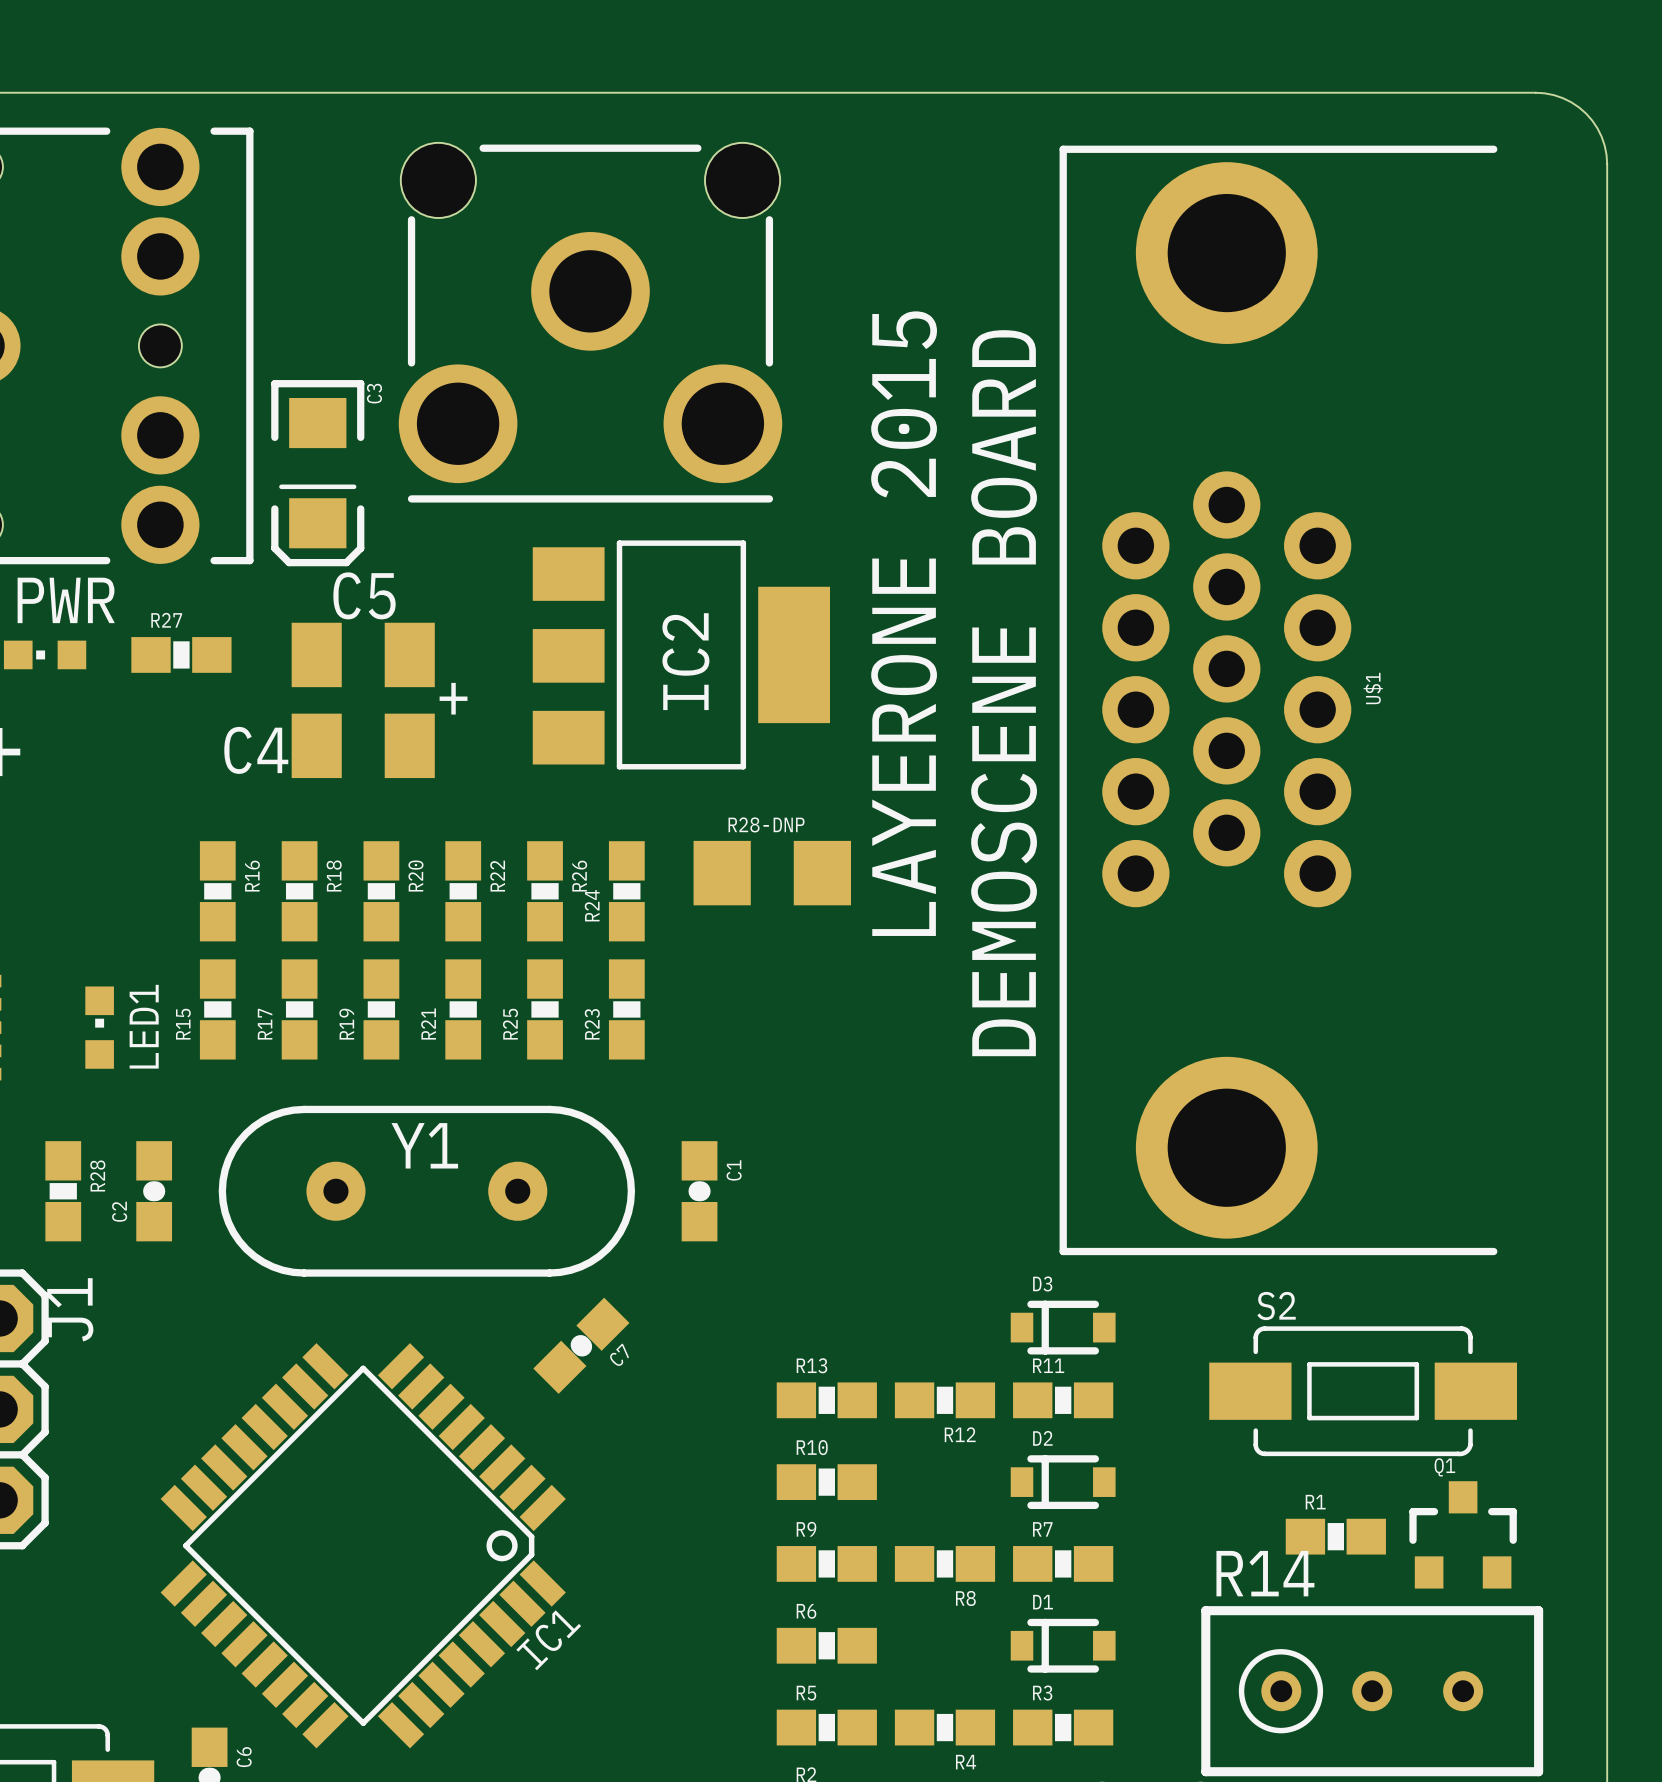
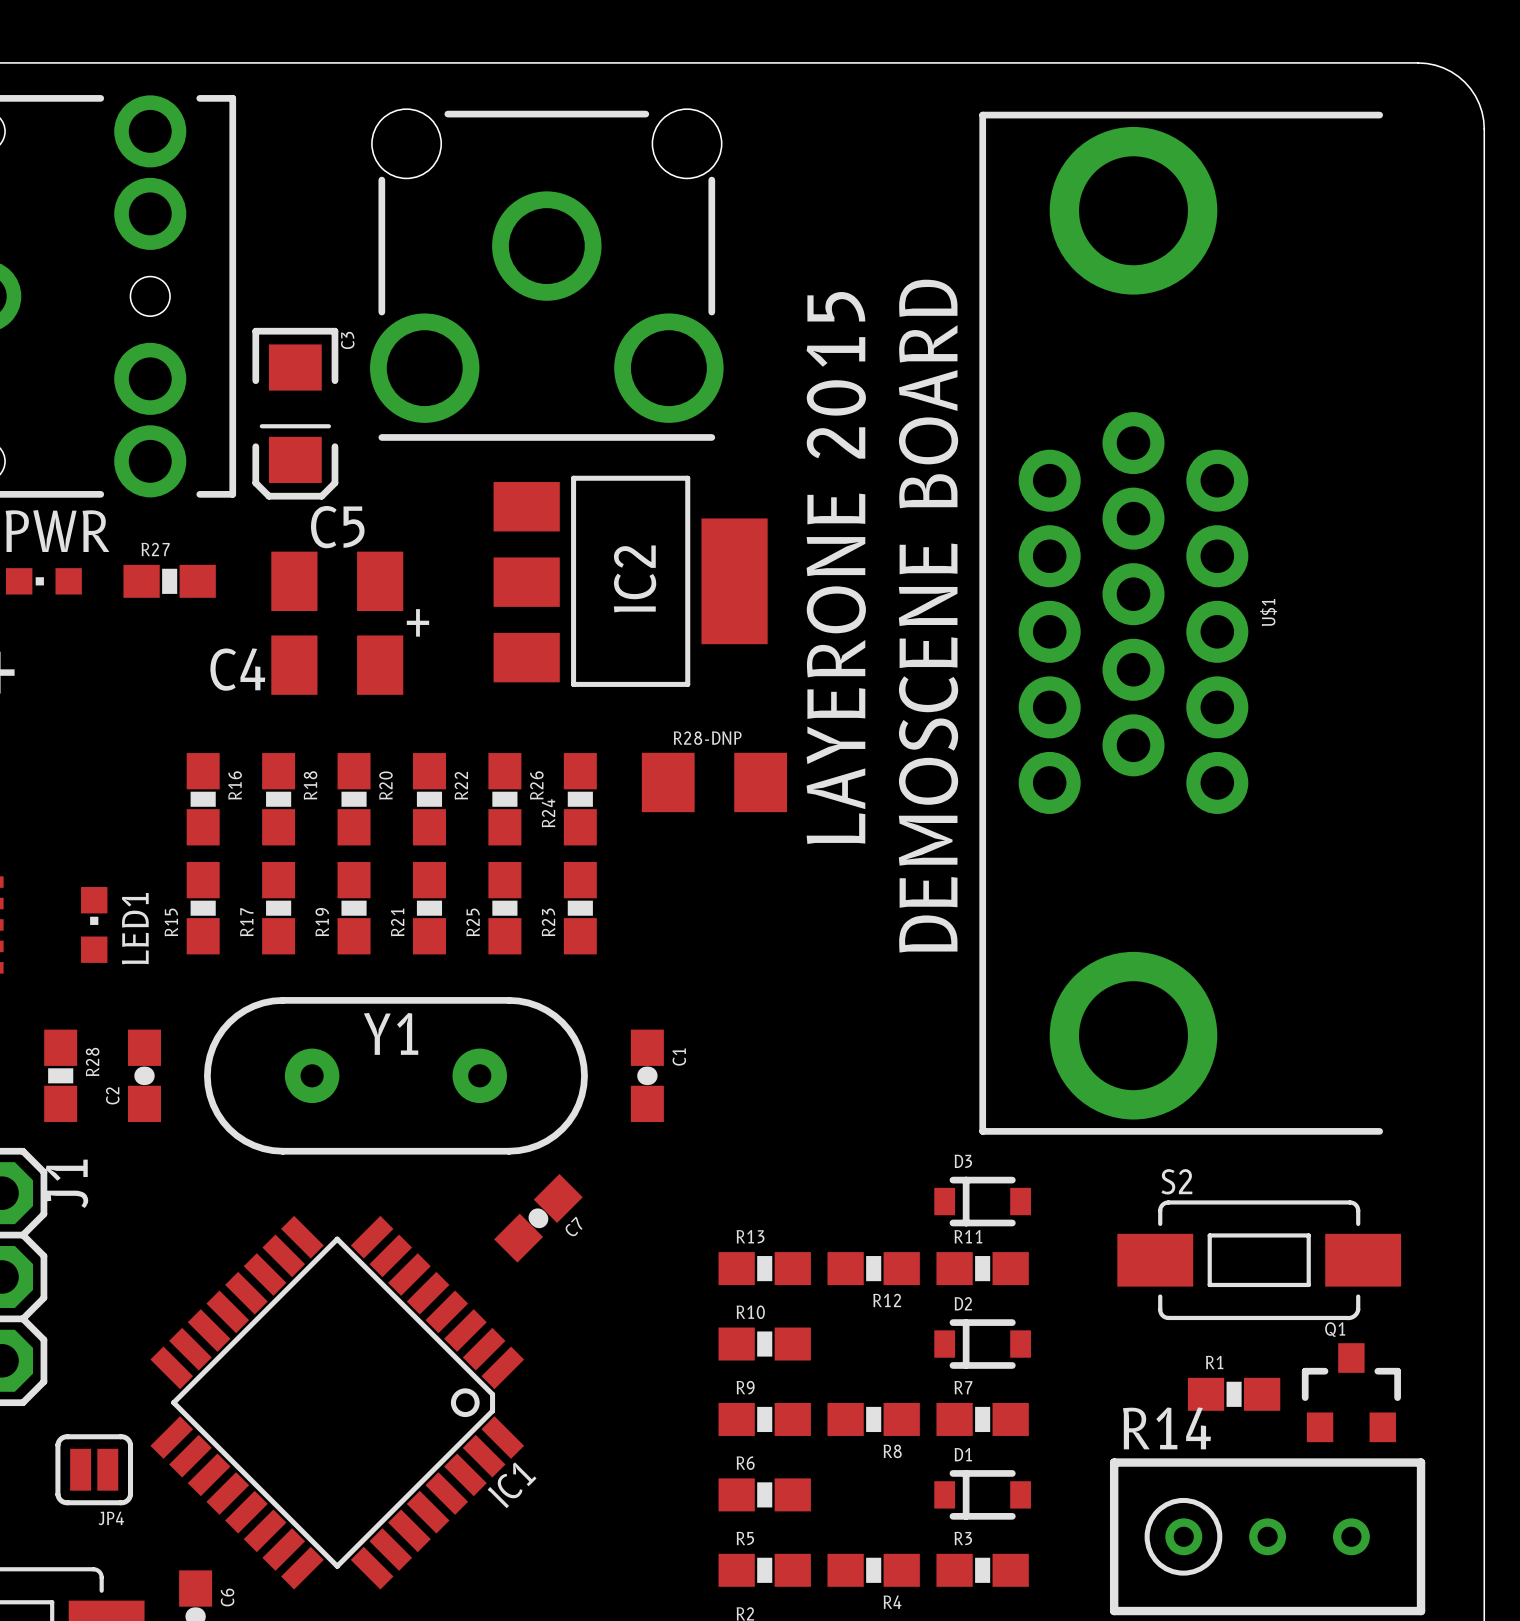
JP4: none -> (94, 1469)

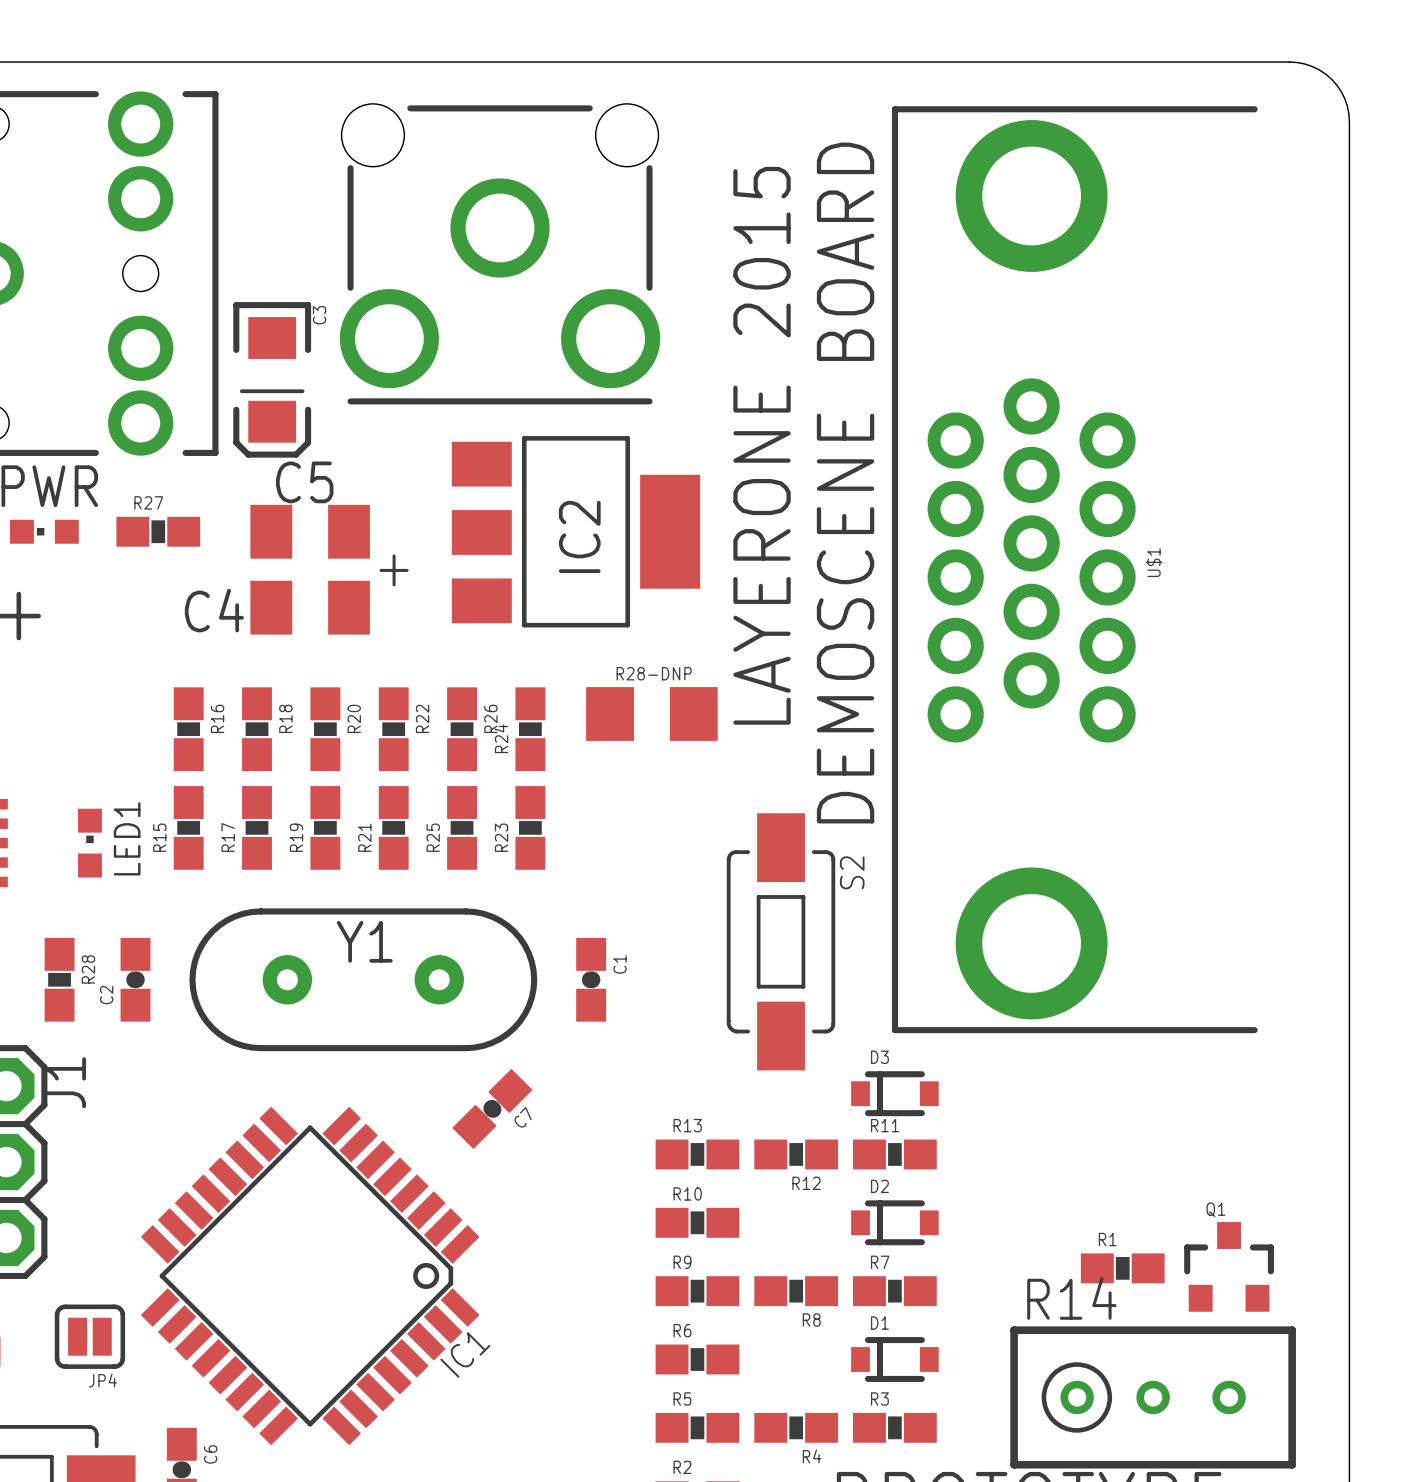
text position: LAYERONE 2015 (836, 567) -> LAYERONE 2015 (762, 445)
text position: DEMOSCENE BOARD (928, 616) -> DEMOSCENE BOARD (845, 483)
S2 rotation: 0° (1259, 1260) -> 90° clockwise (780, 941)
S2 position: (1259, 1260) -> (780, 941)

